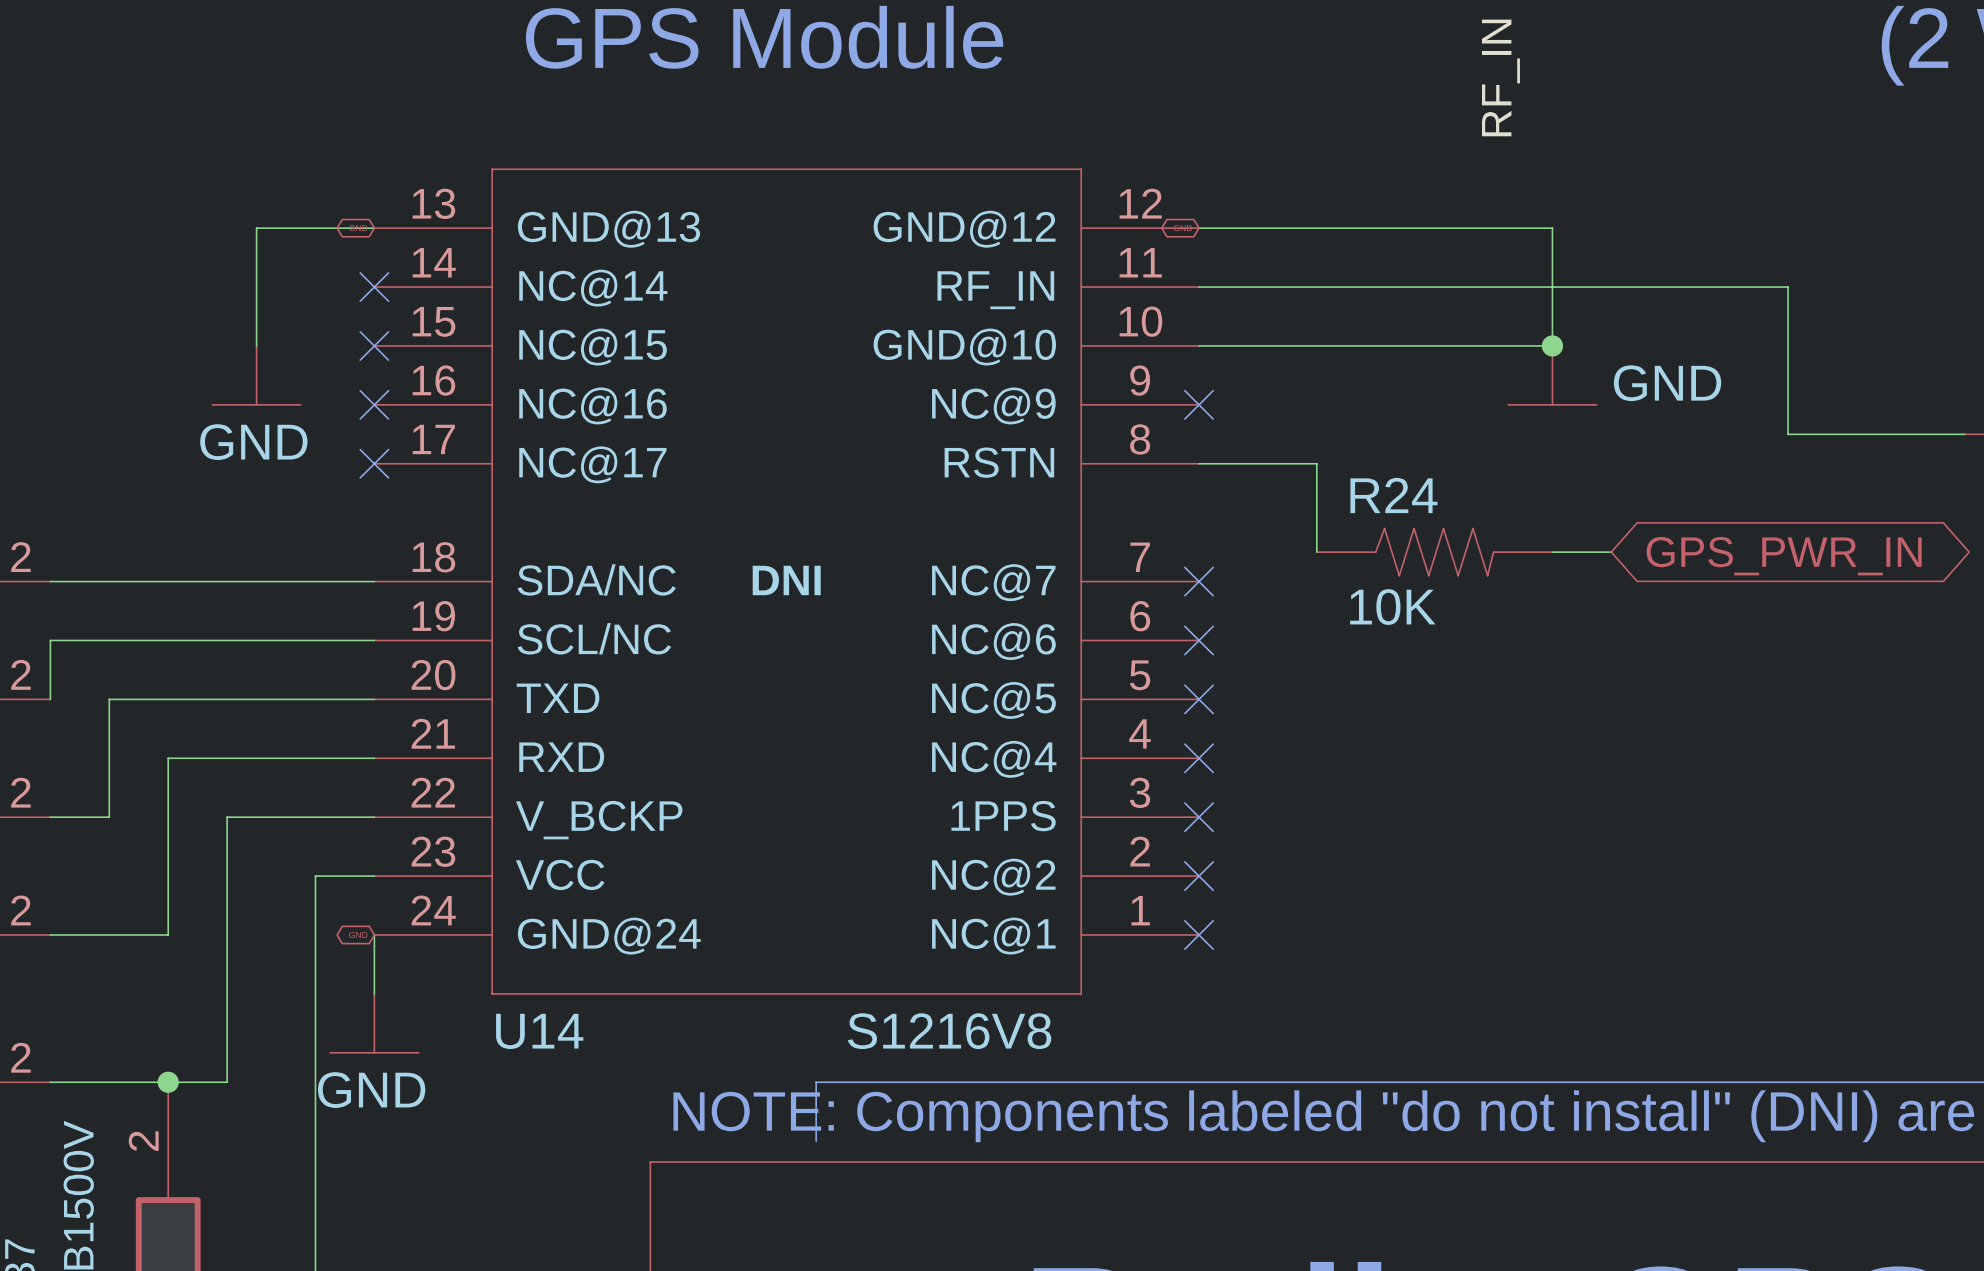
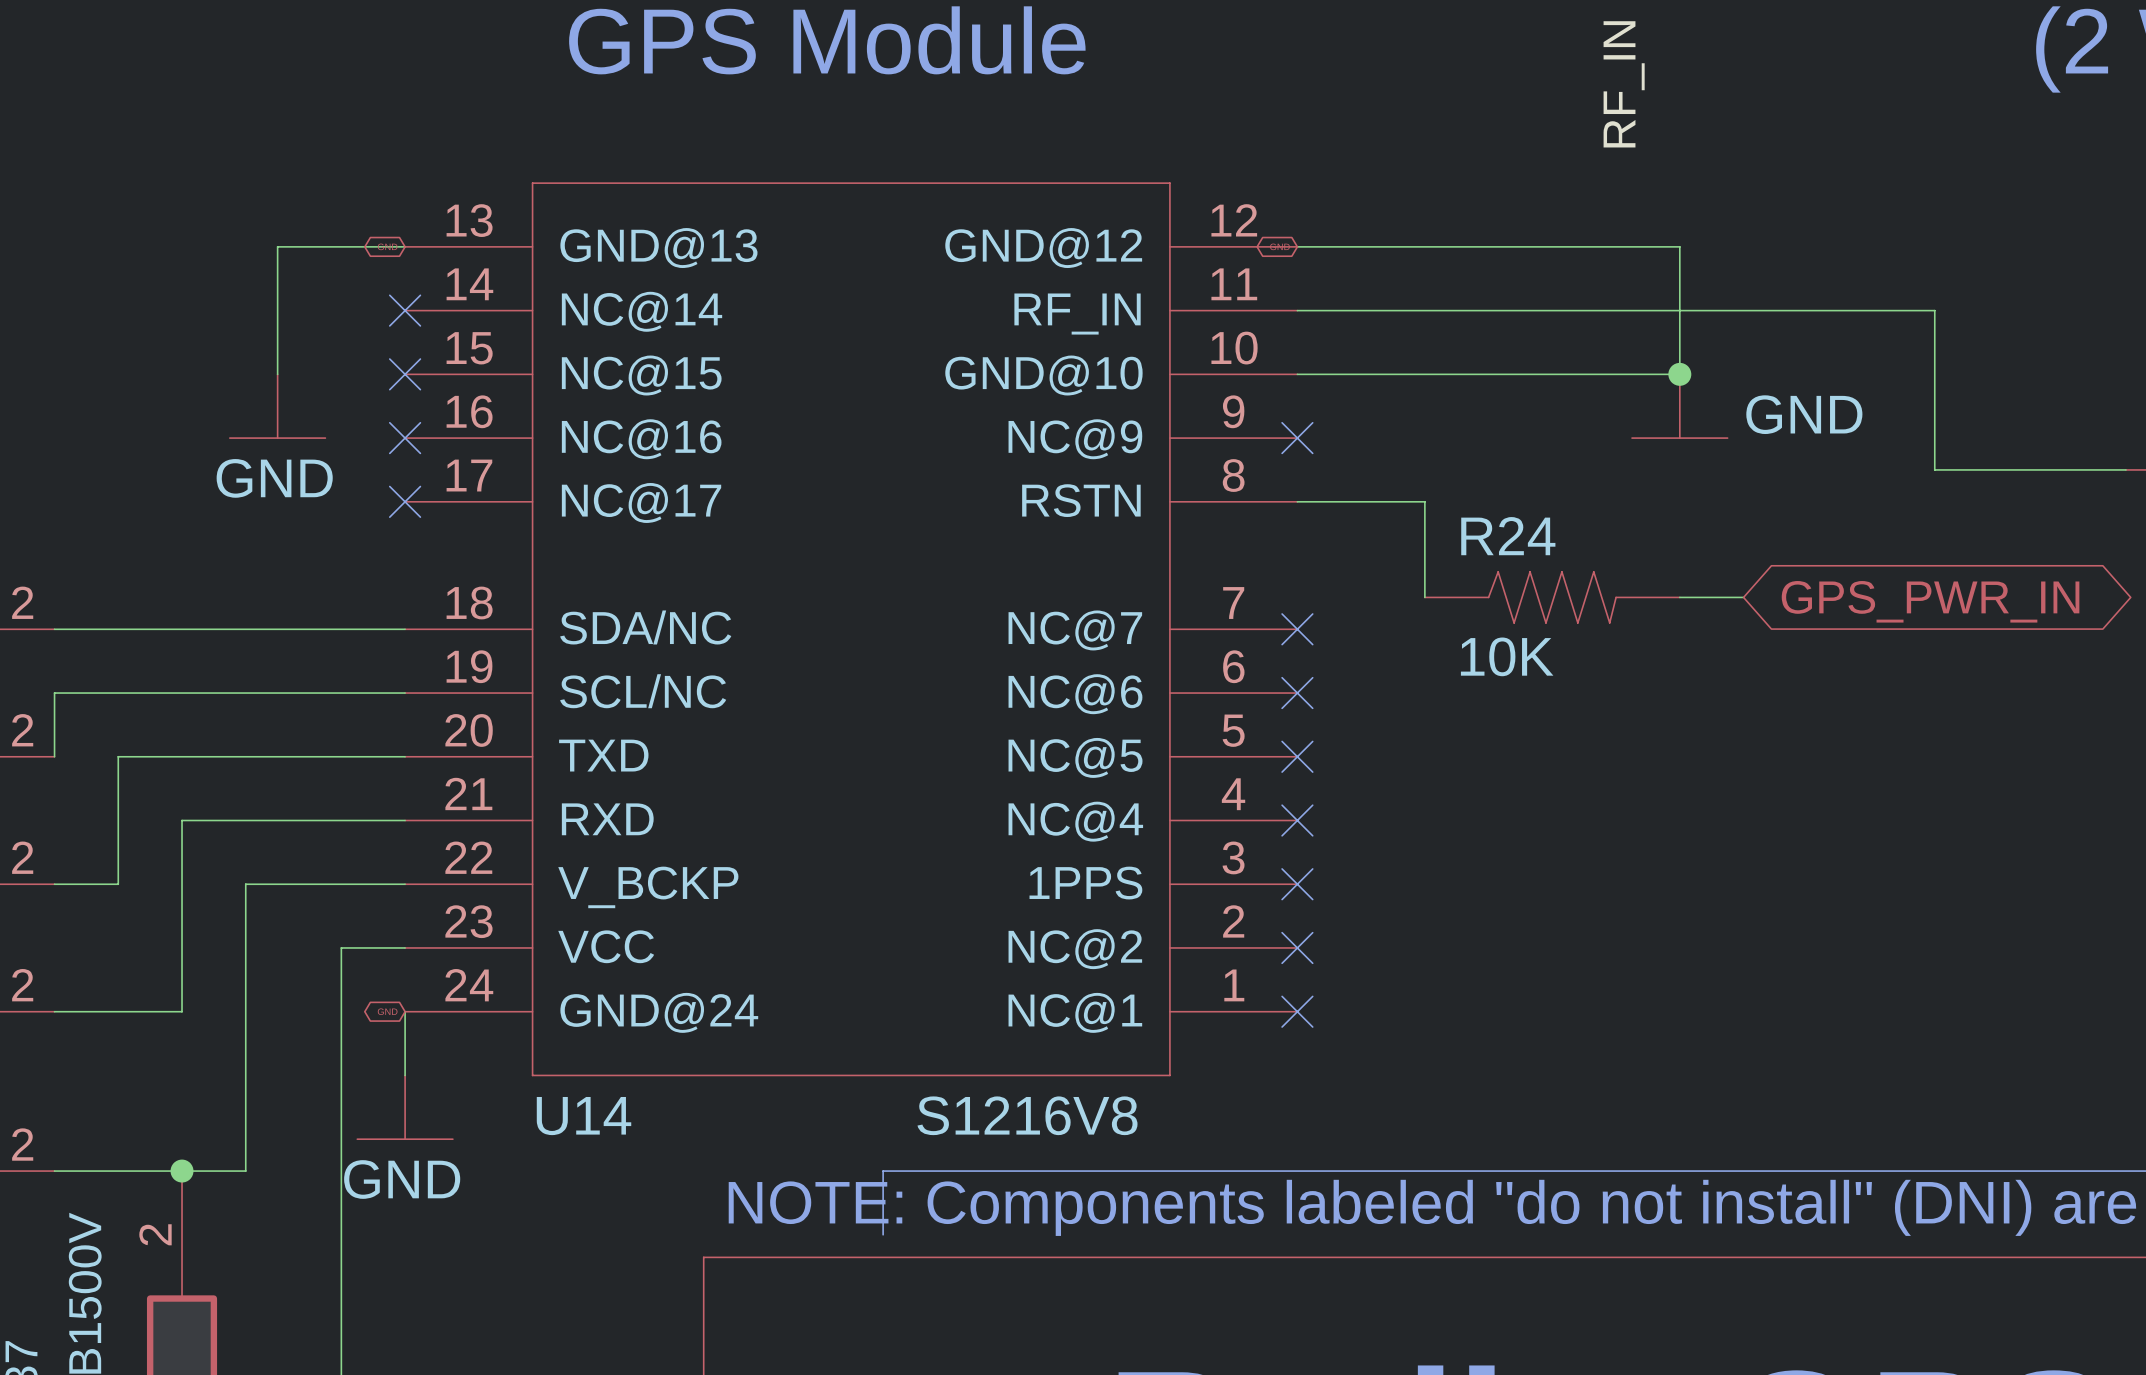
U14 text: DNI (786, 580) -> none

